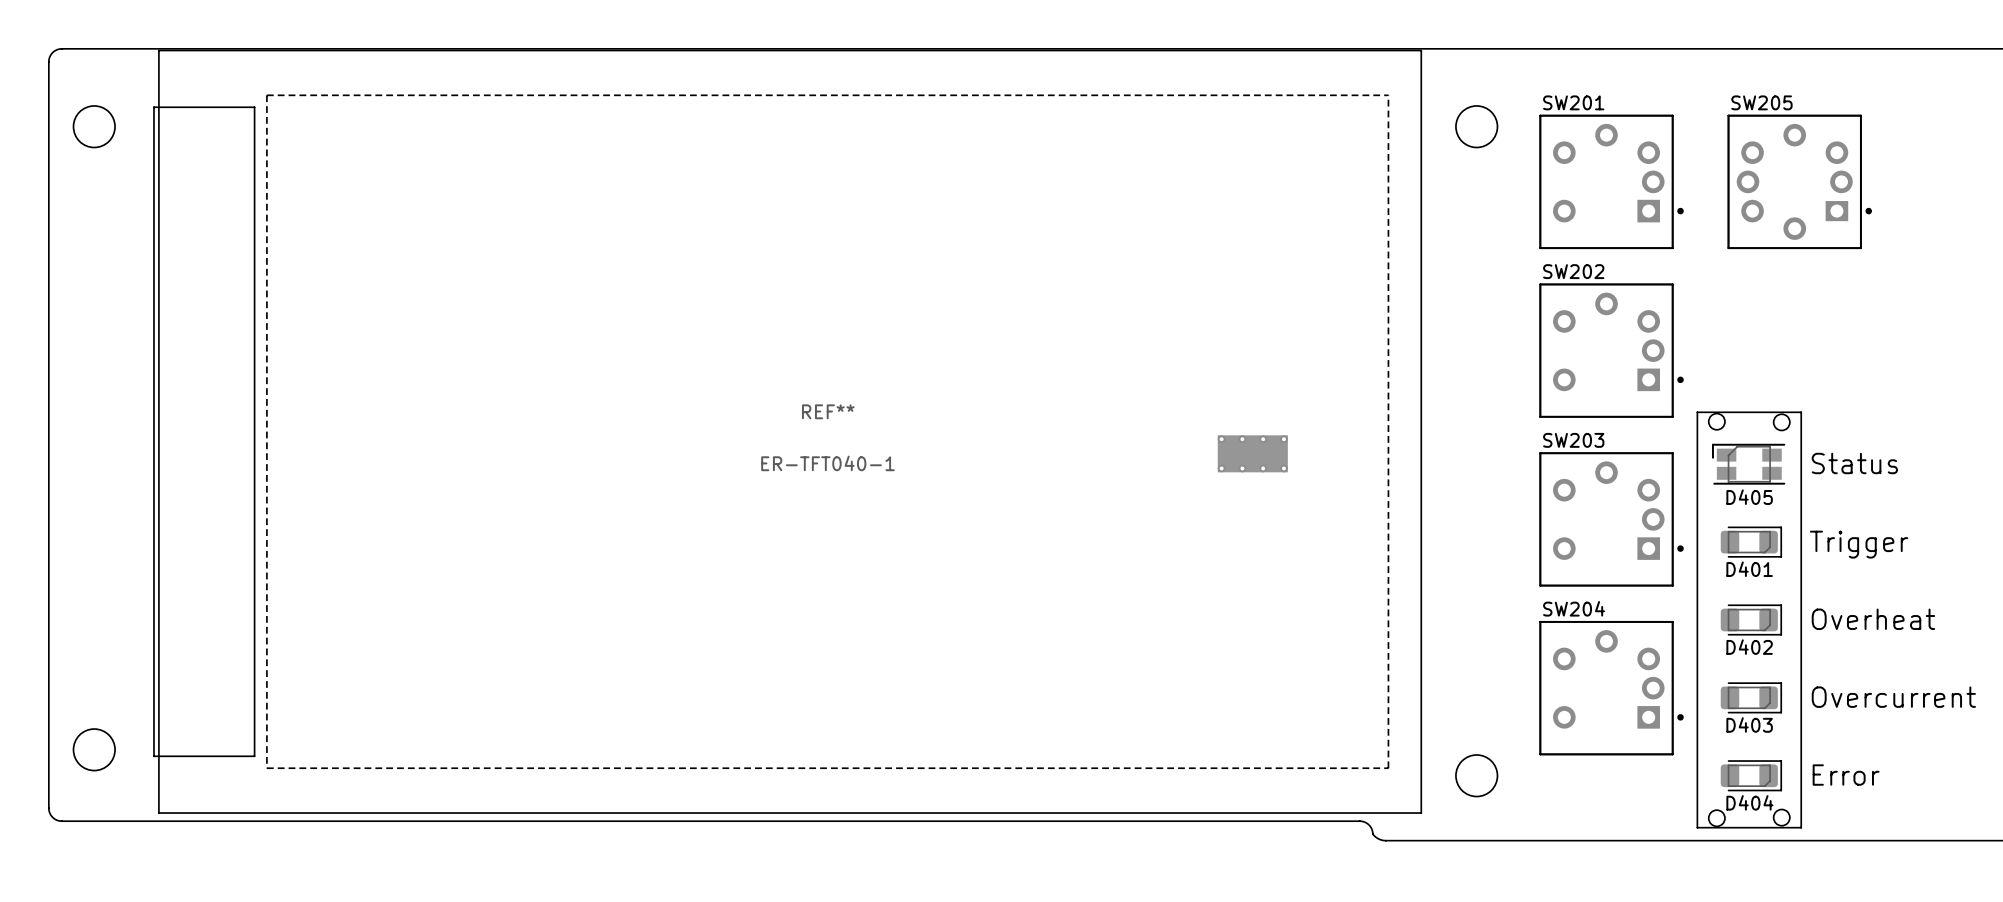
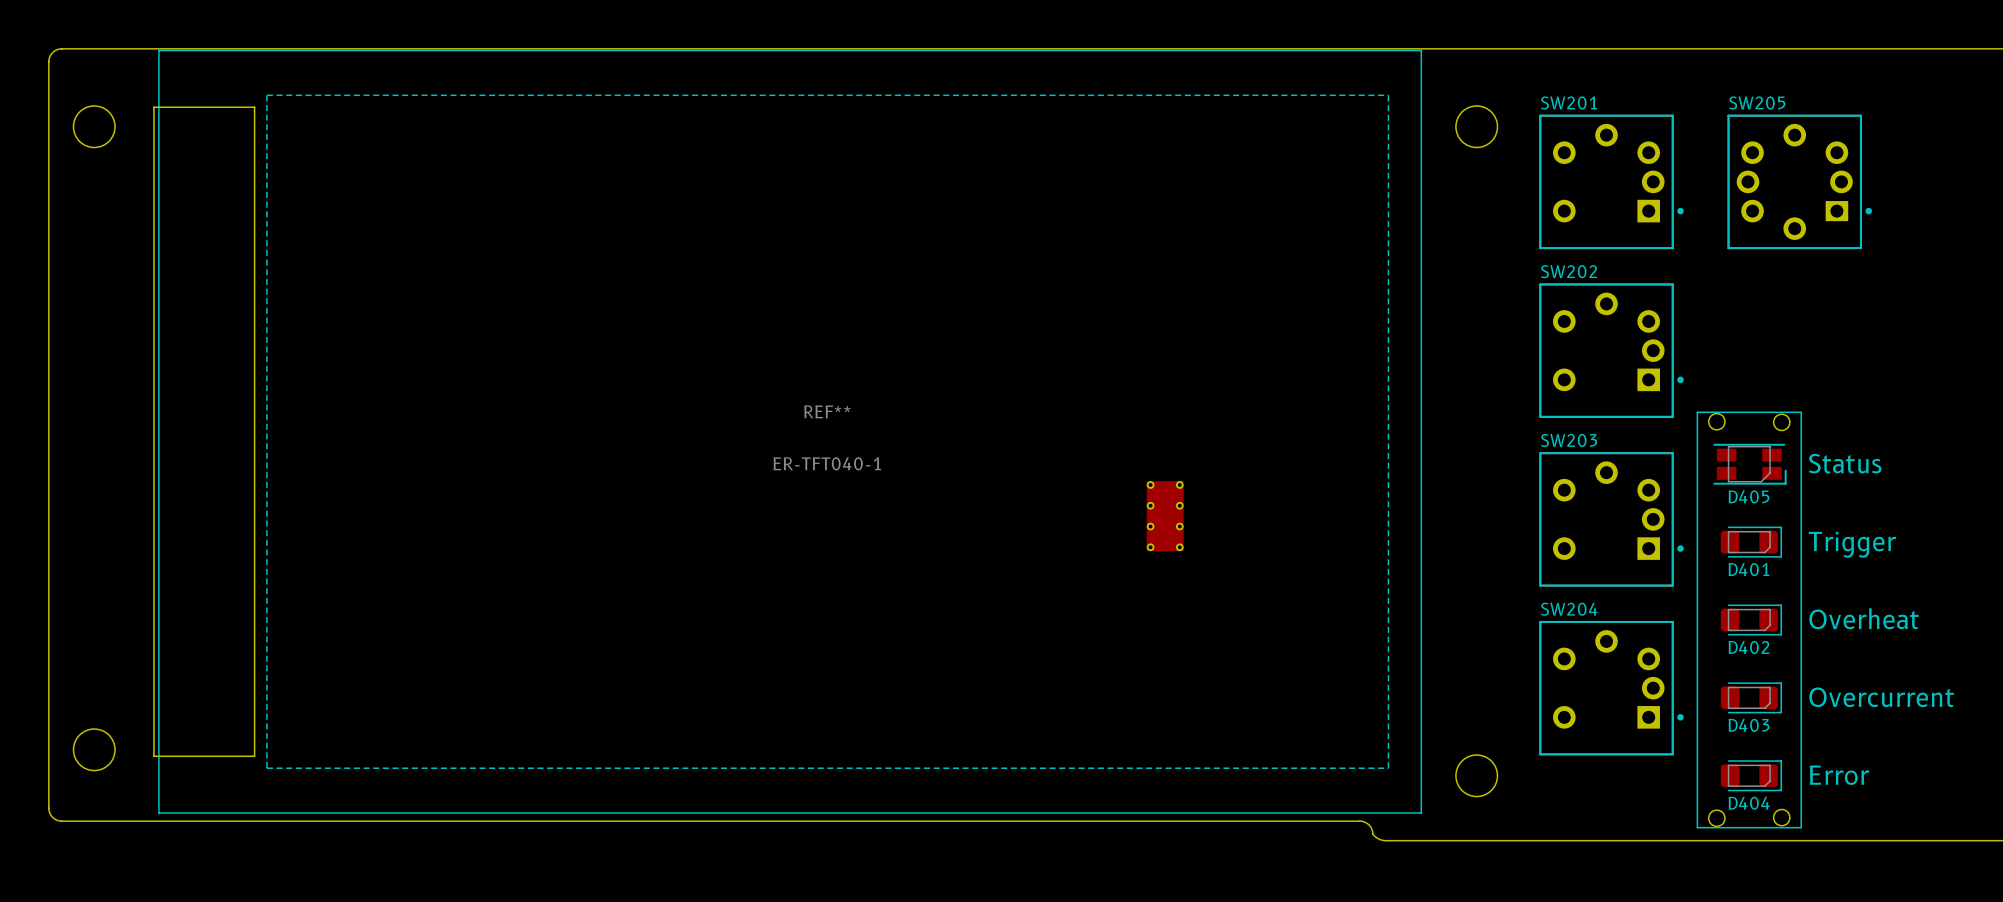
part rotation: 0° (1252, 453) -> 90° clockwise (1165, 516)
part position: (1252, 453) -> (1165, 516)
D405 rotation: 0° (1748, 464) -> 180° (1749, 464)

